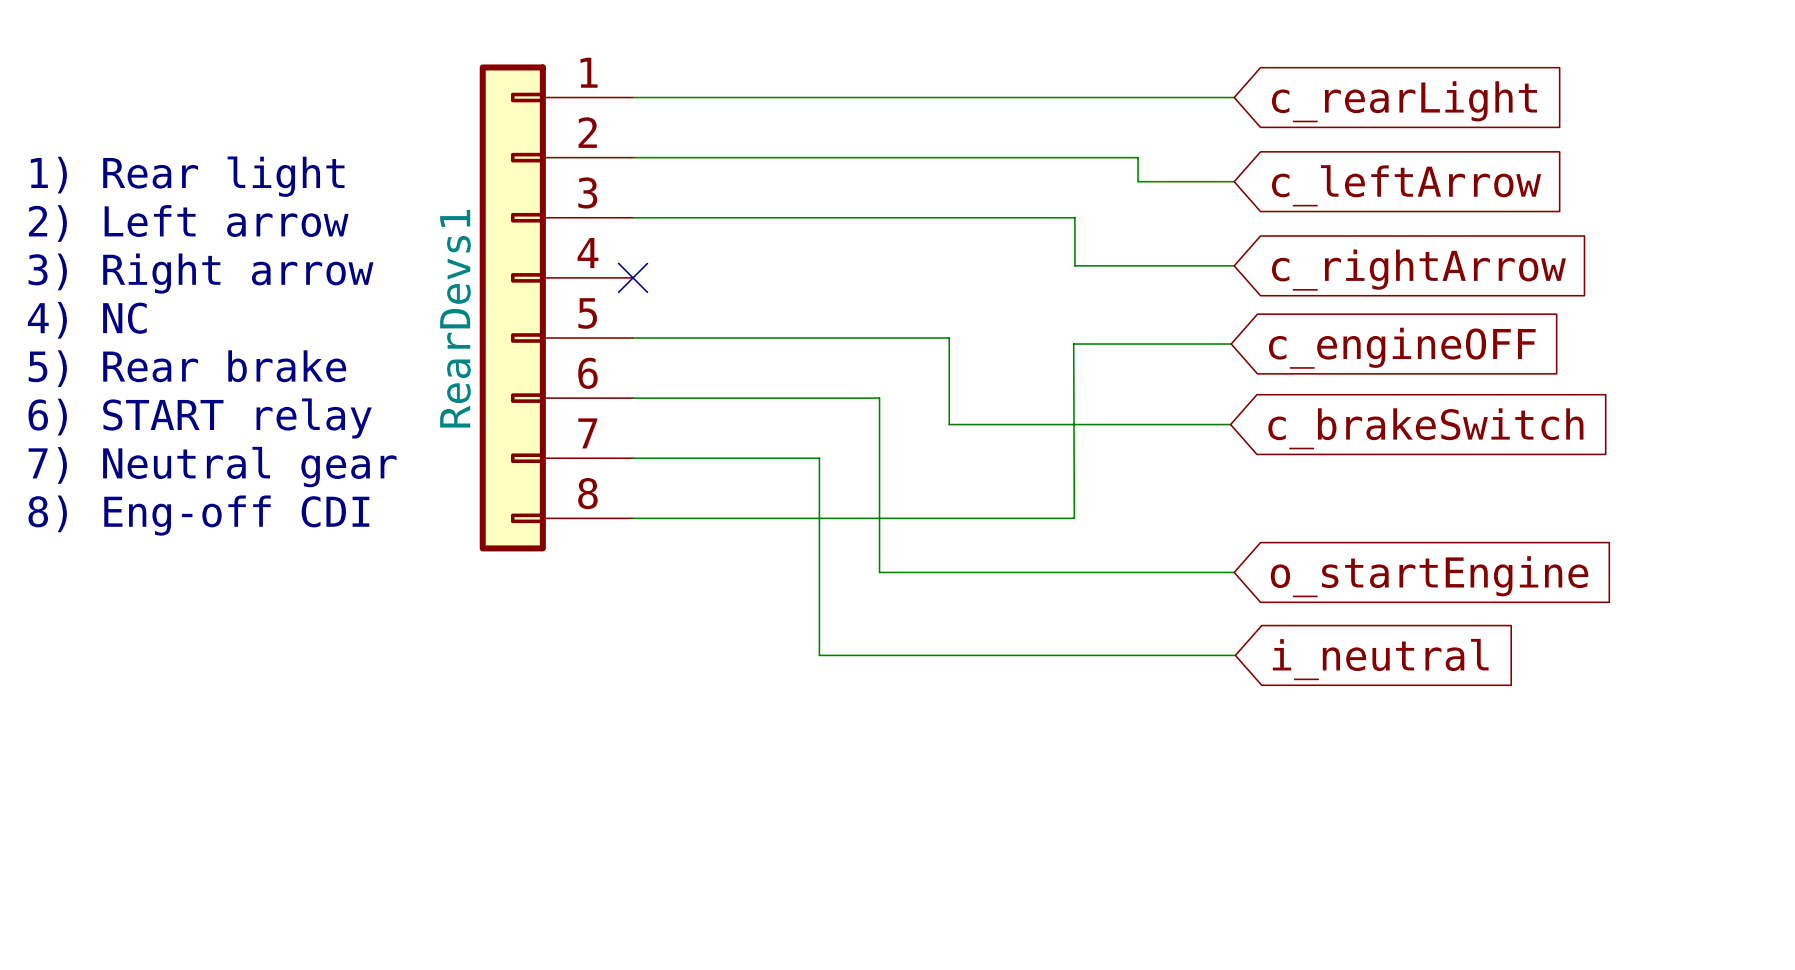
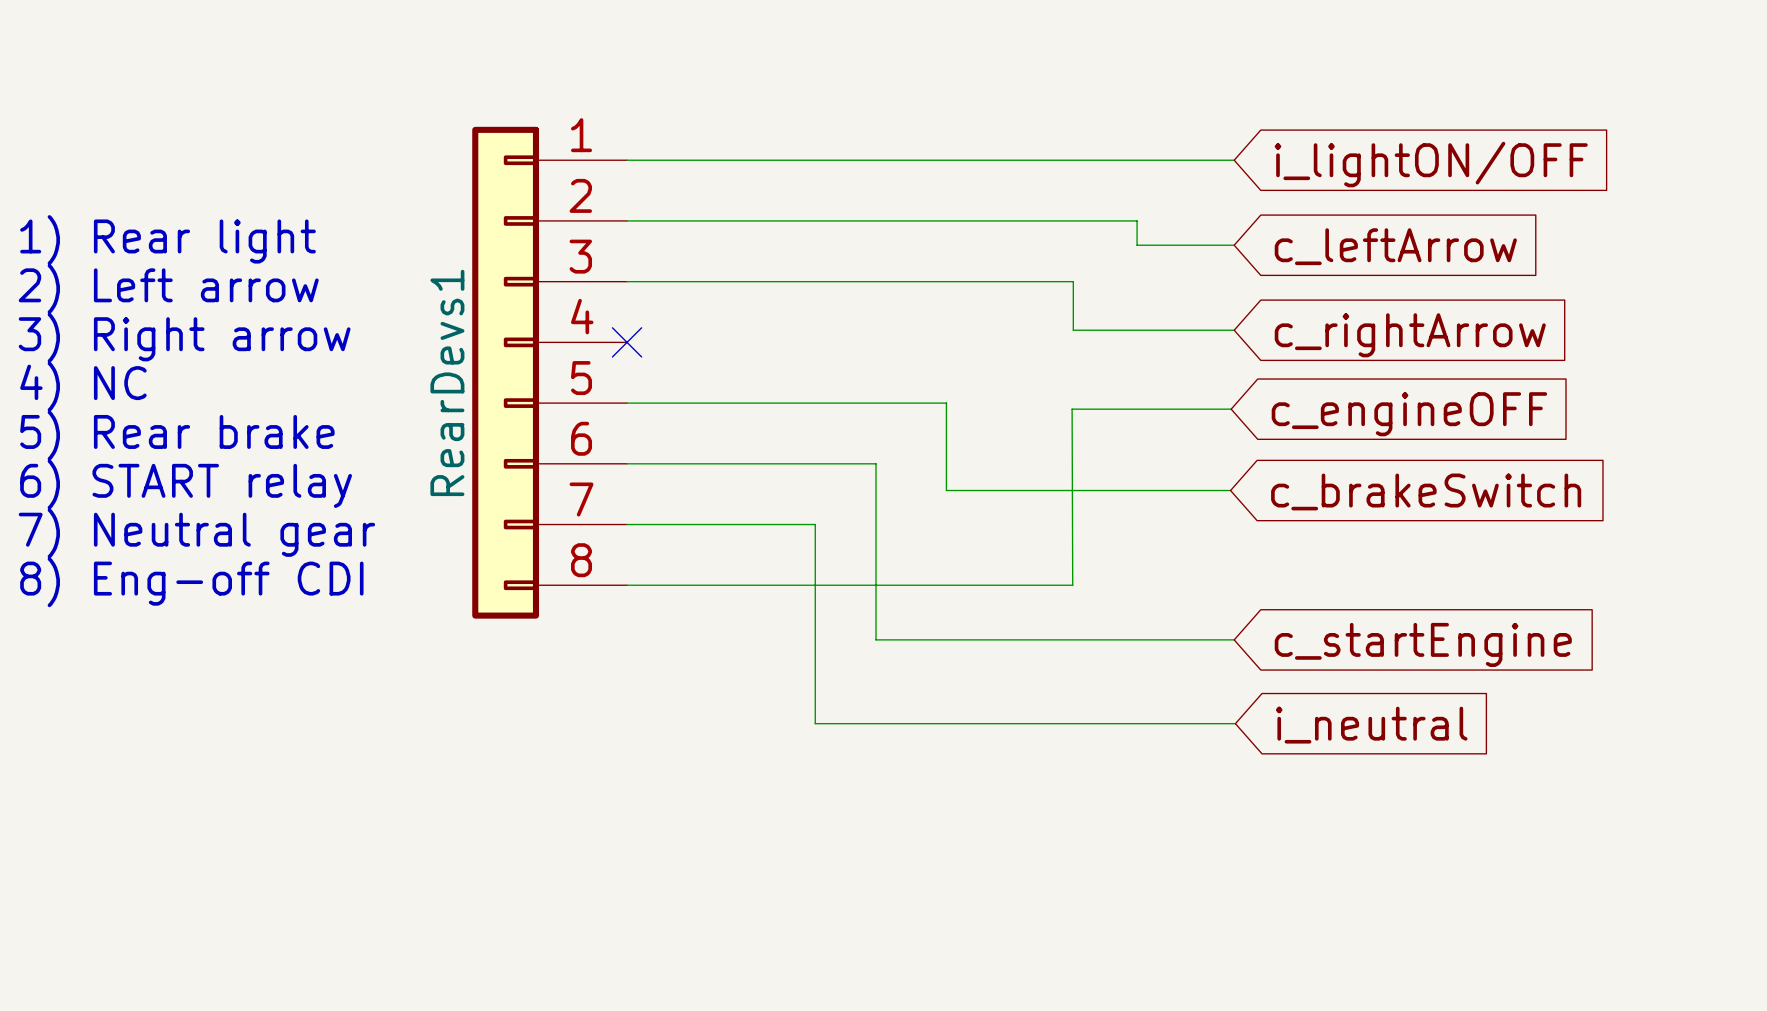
global label: c_rearLight (1404, 101) -> i_lightON/OFF (1431, 164)
global label: o_startEngine (1429, 576) -> c_startEngine (1423, 644)

